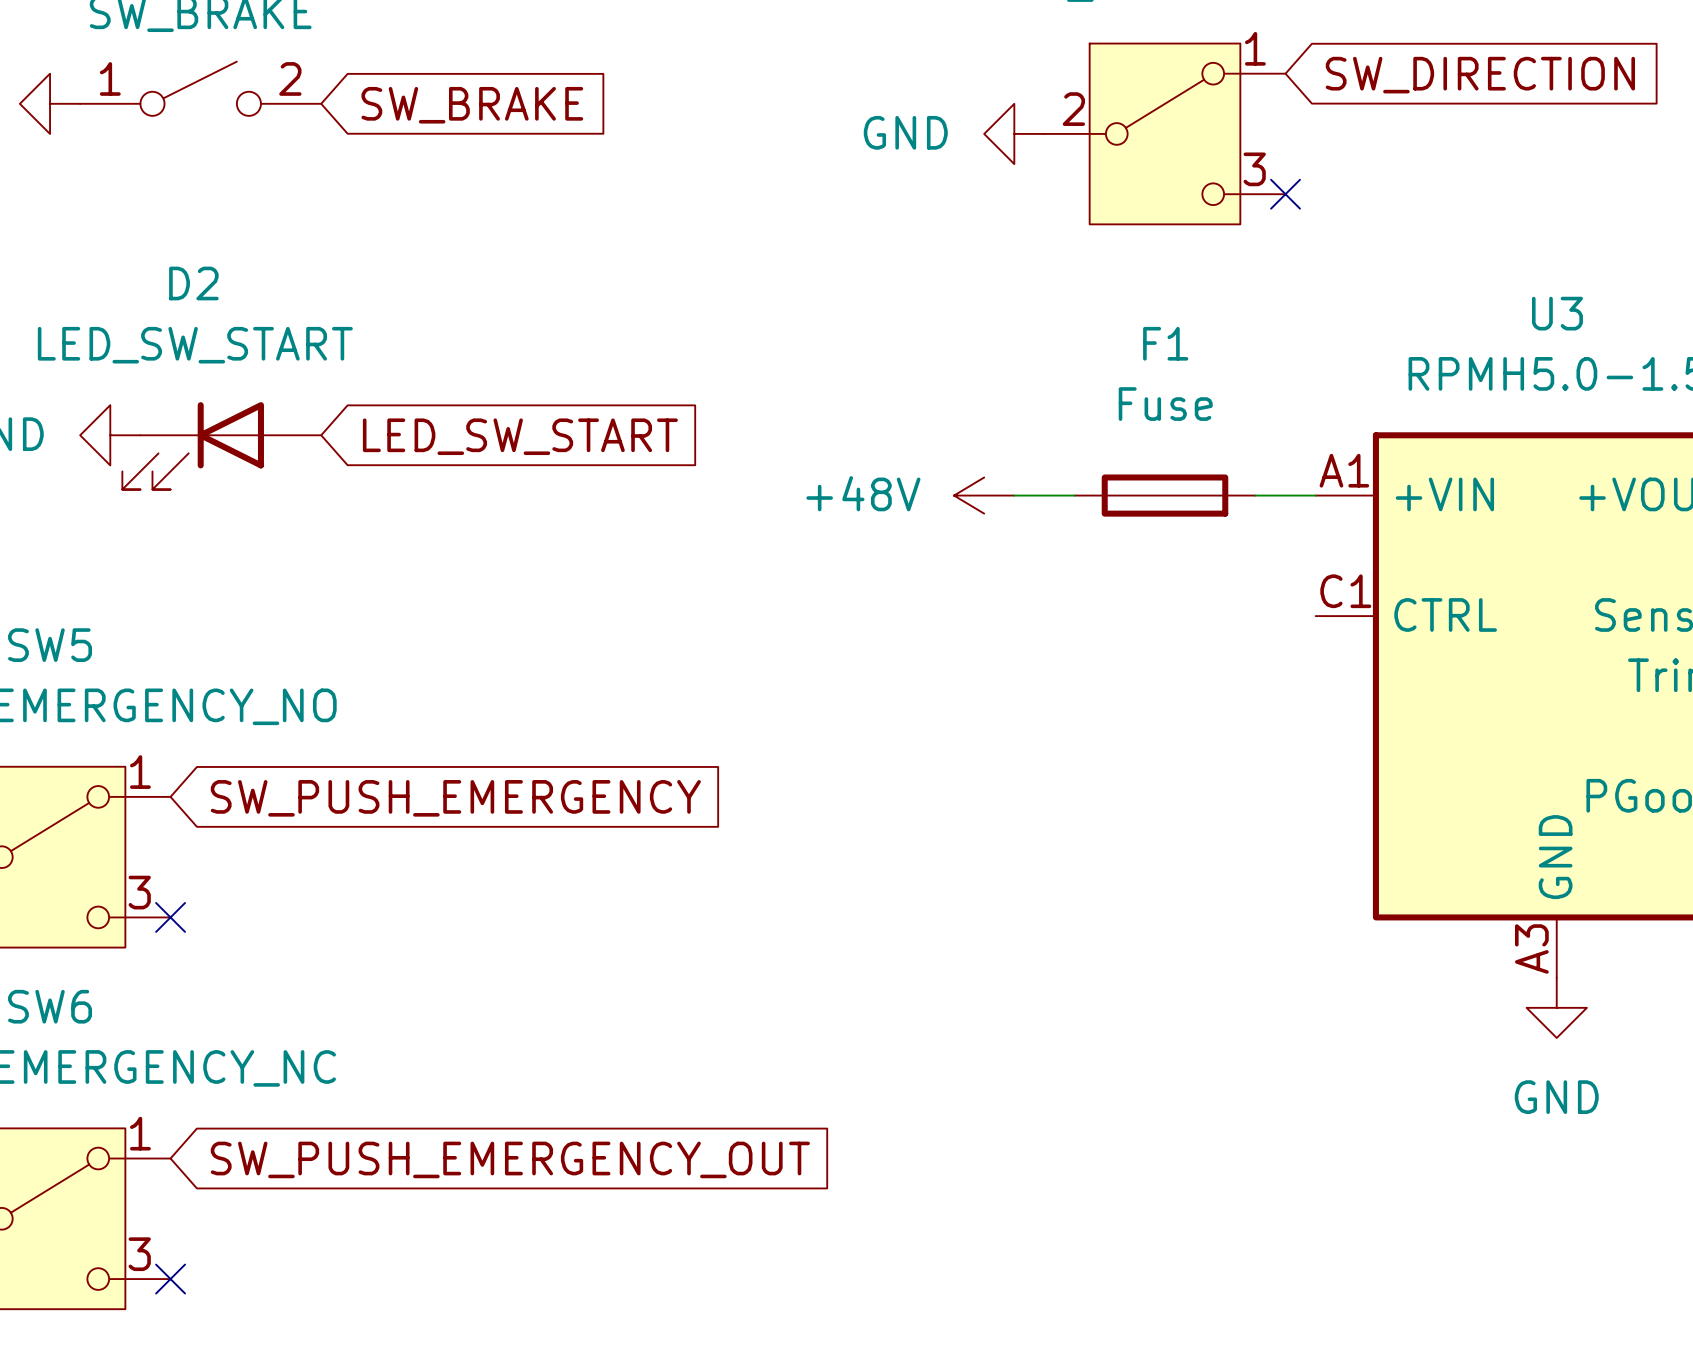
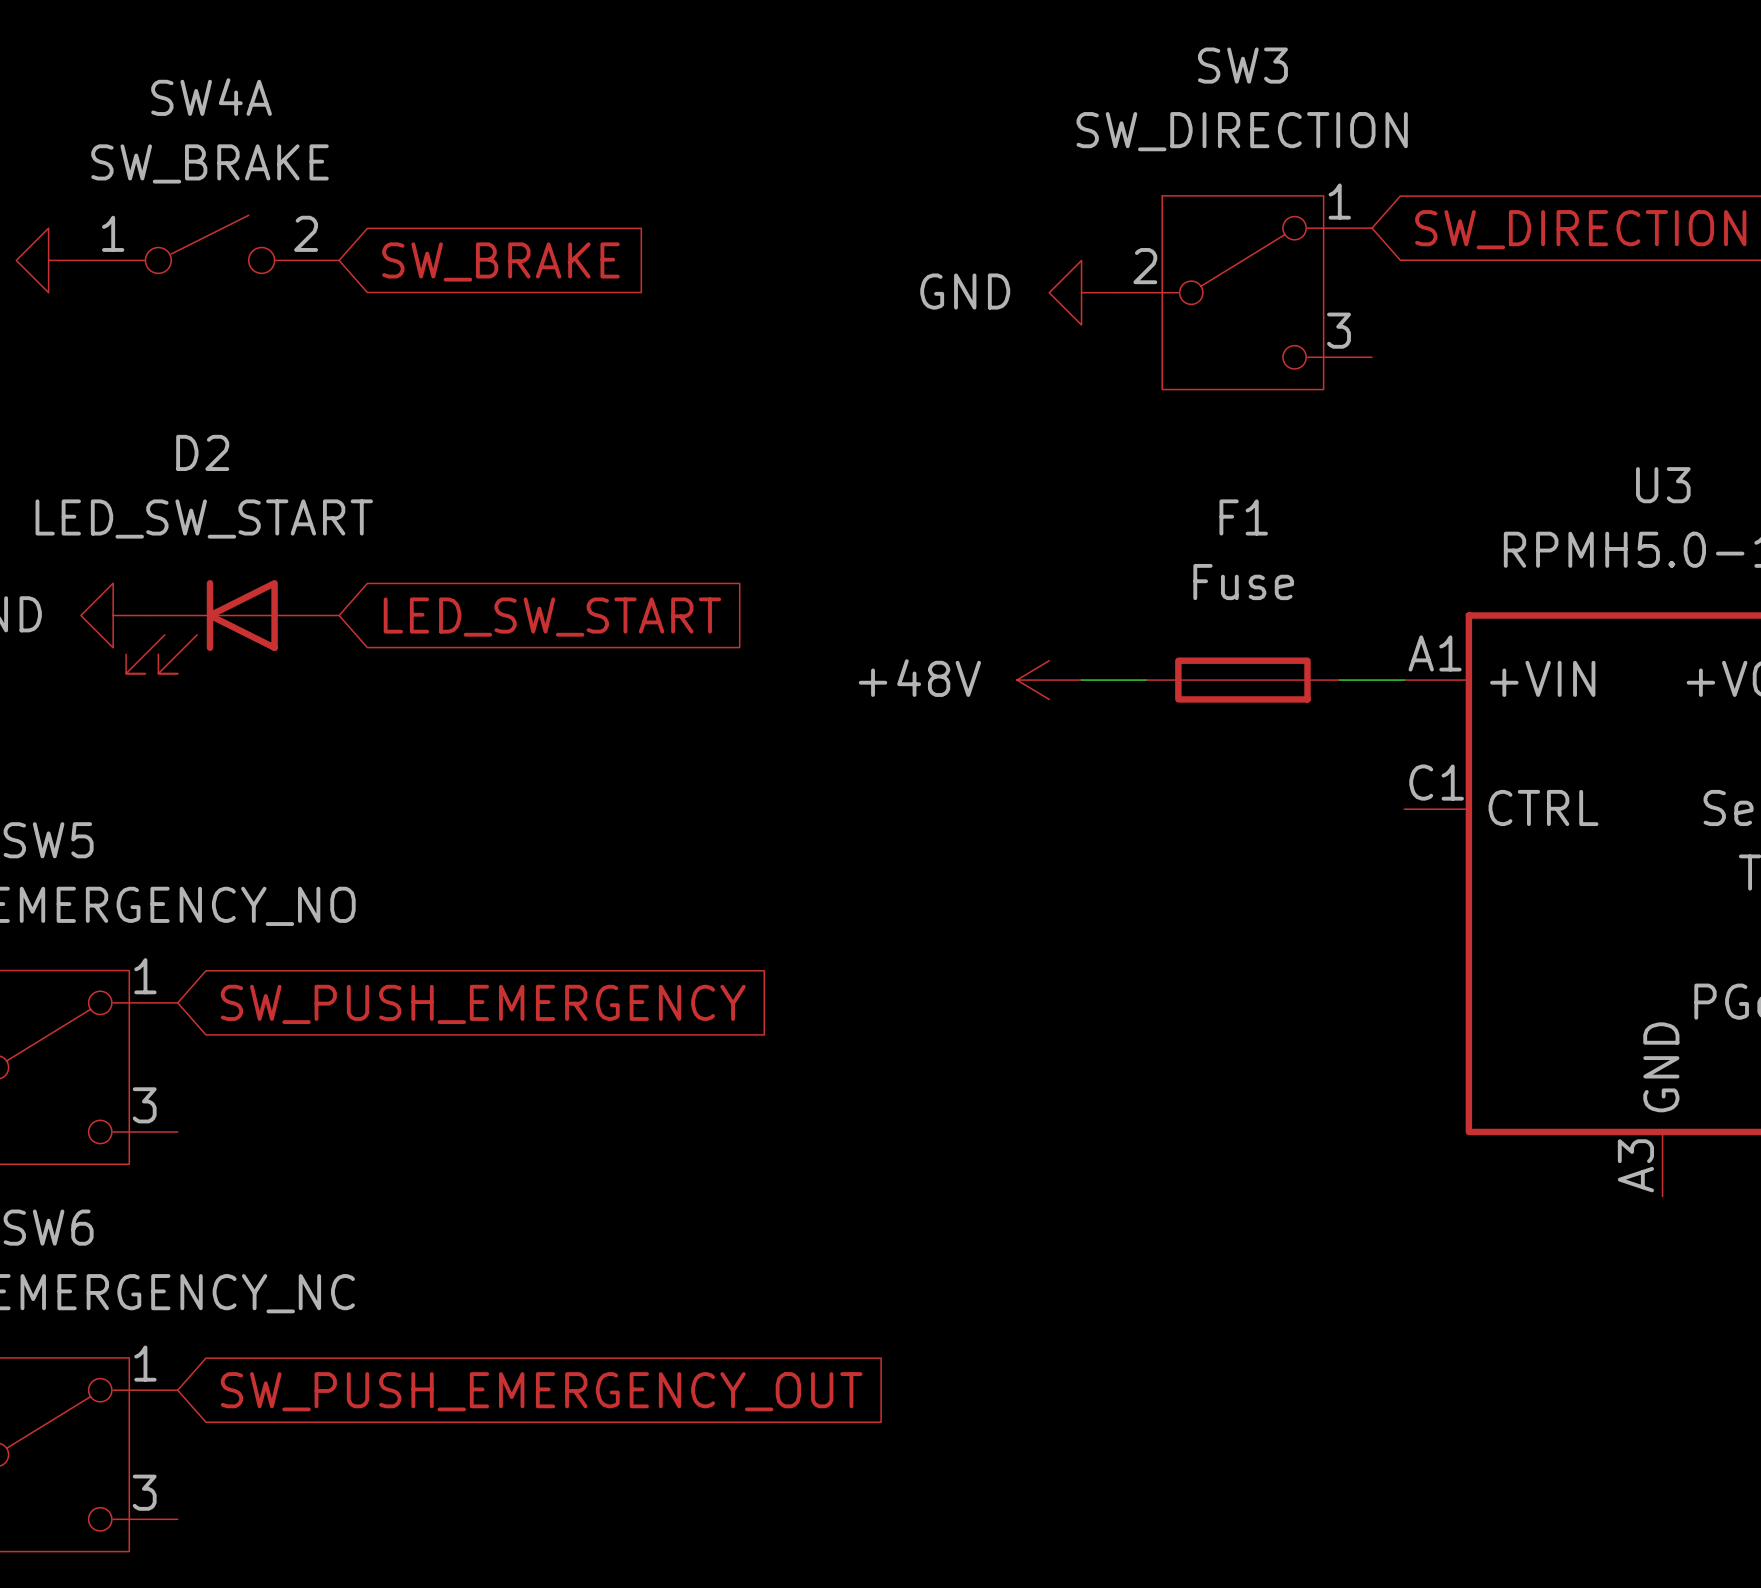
no-connect mark: (1285, 194) -> none
no-connect mark: (170, 917) -> none
power symbol: GND (1556, 1007) -> none
no-connect mark: (170, 1279) -> none

